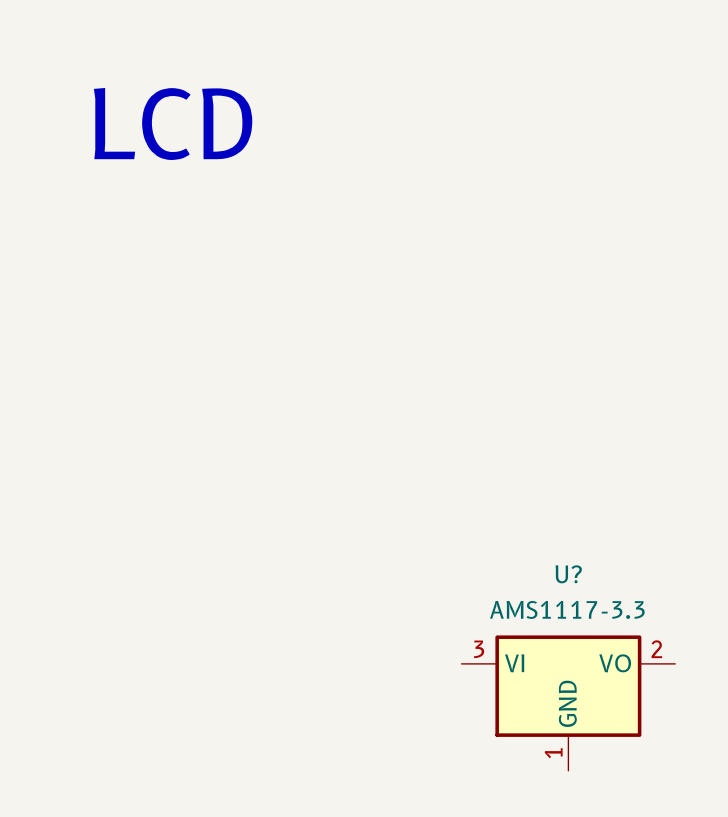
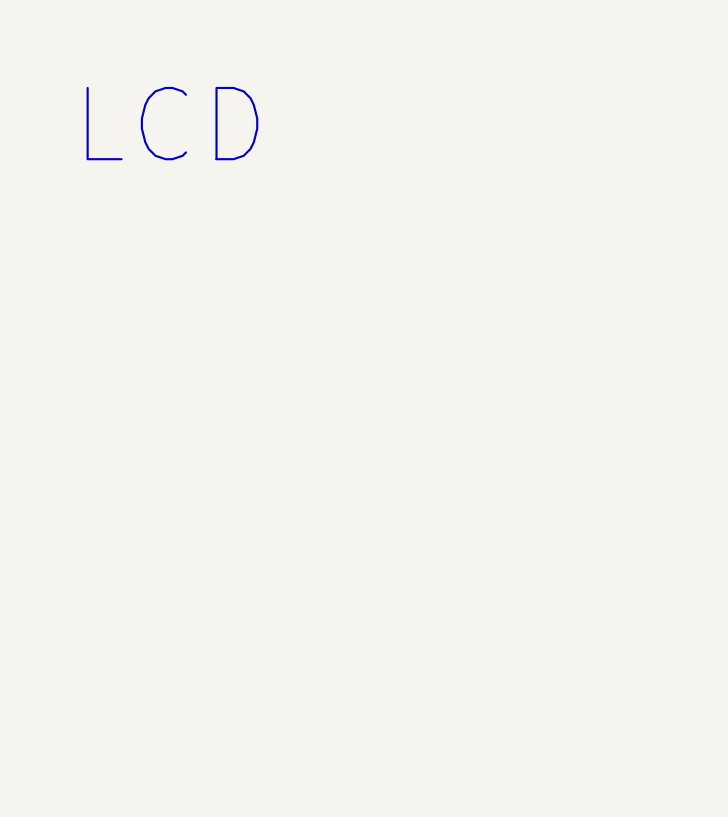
U?: AMS1117-3.3 (568, 703) -> none

